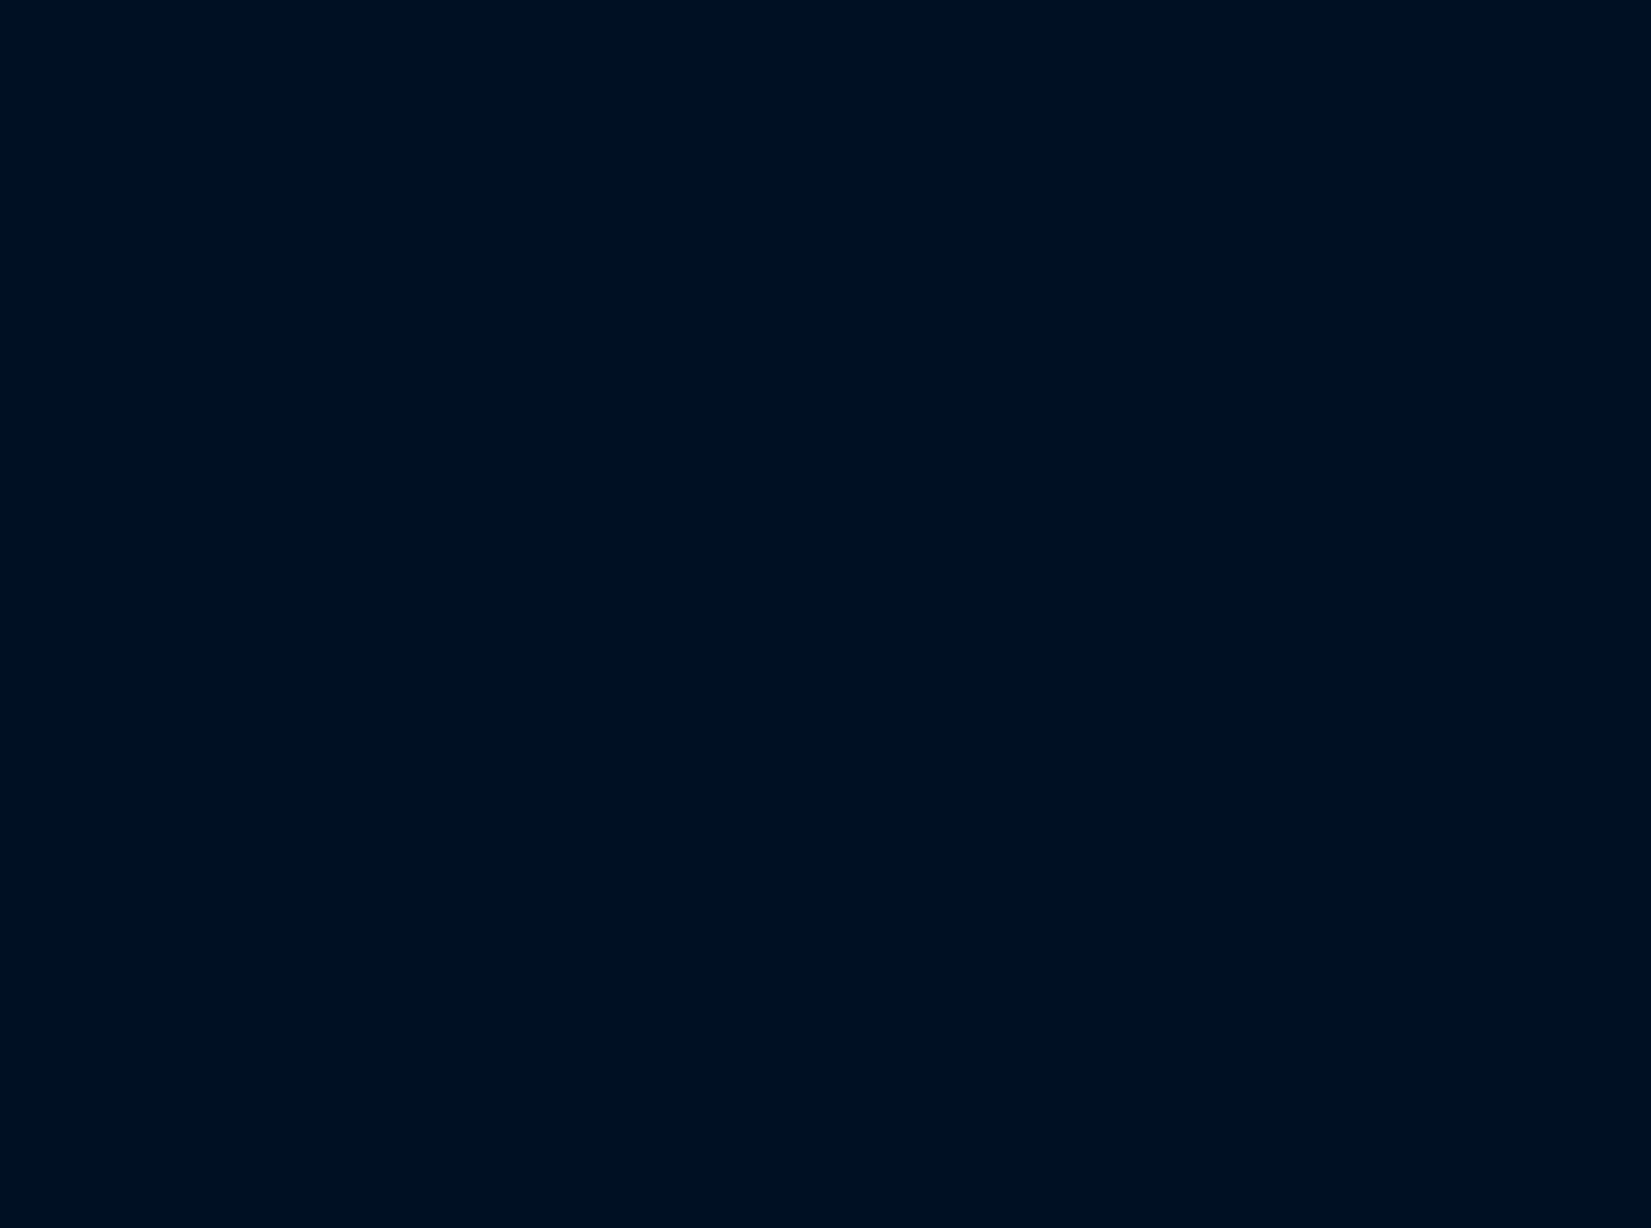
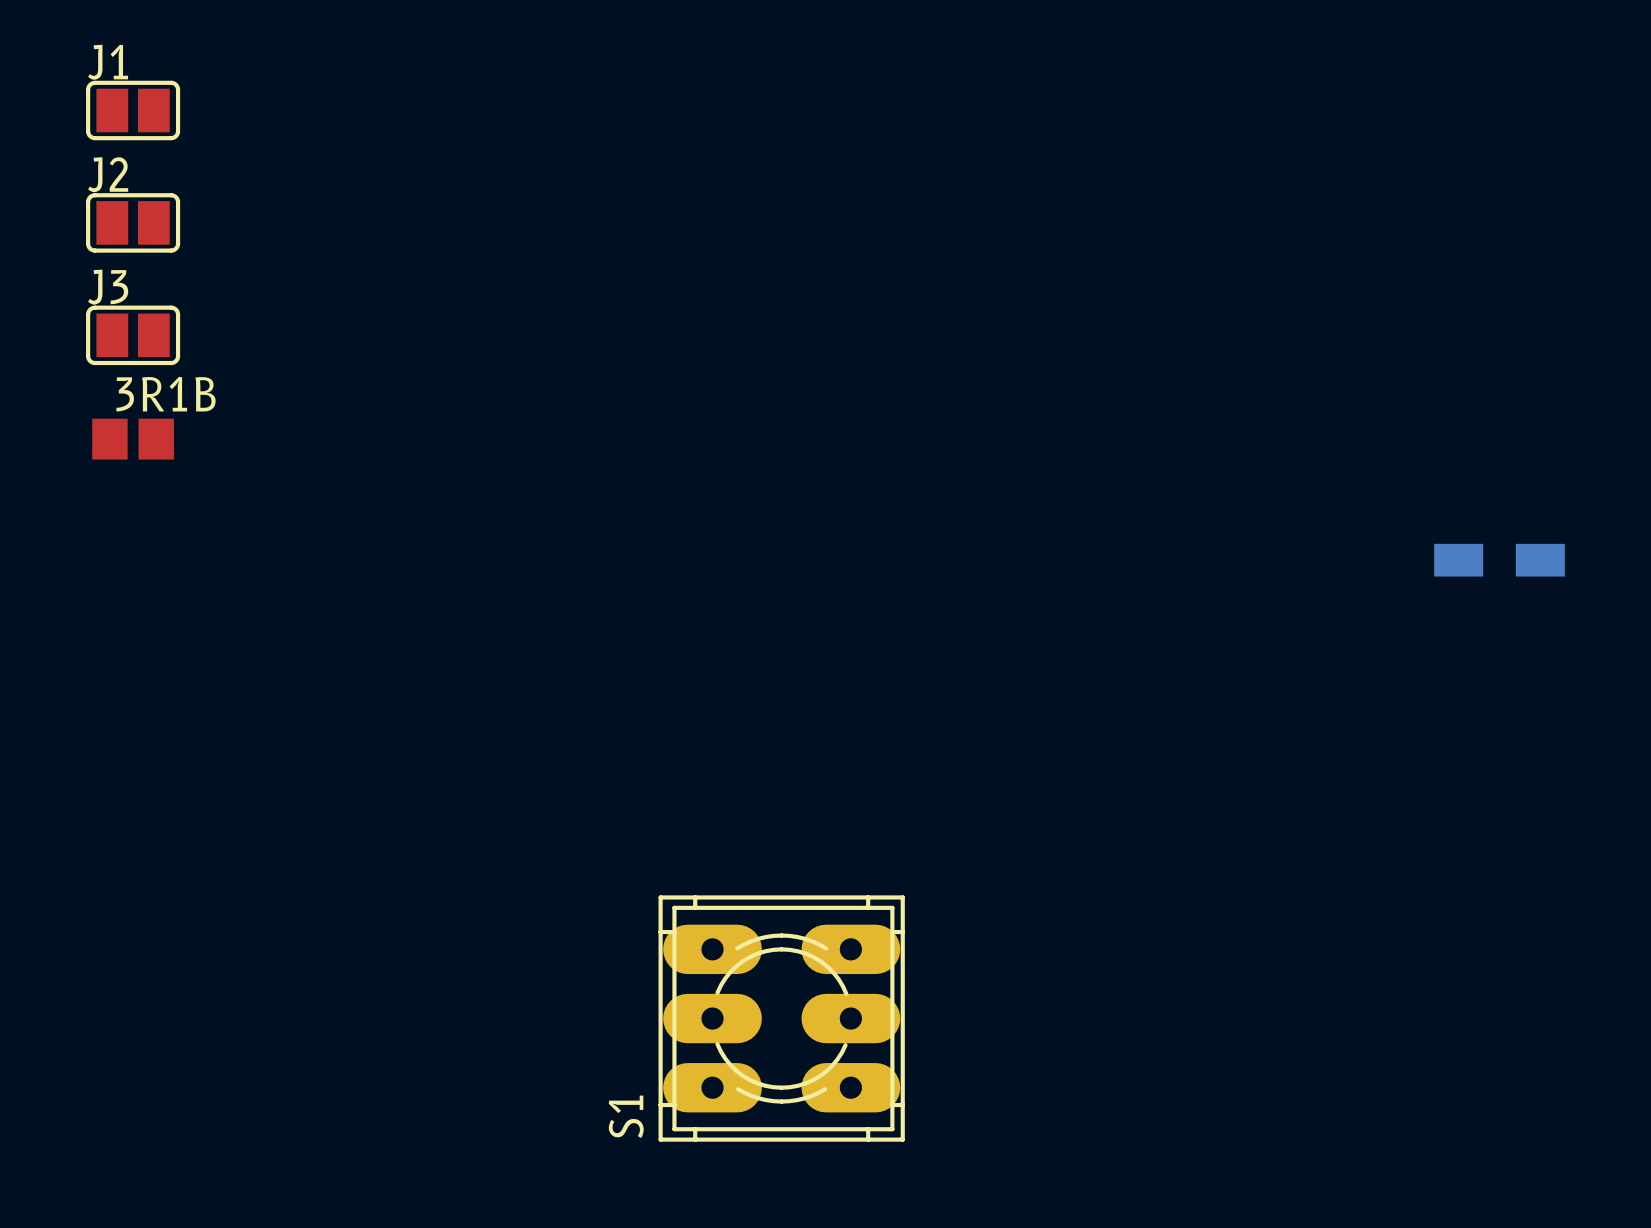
J1: none -> (133, 110)
J2: none -> (133, 222)
J3: none -> (133, 335)
3R1B: none -> (133, 439)
part: none -> (1499, 560)
S1: none -> (781, 1018)

